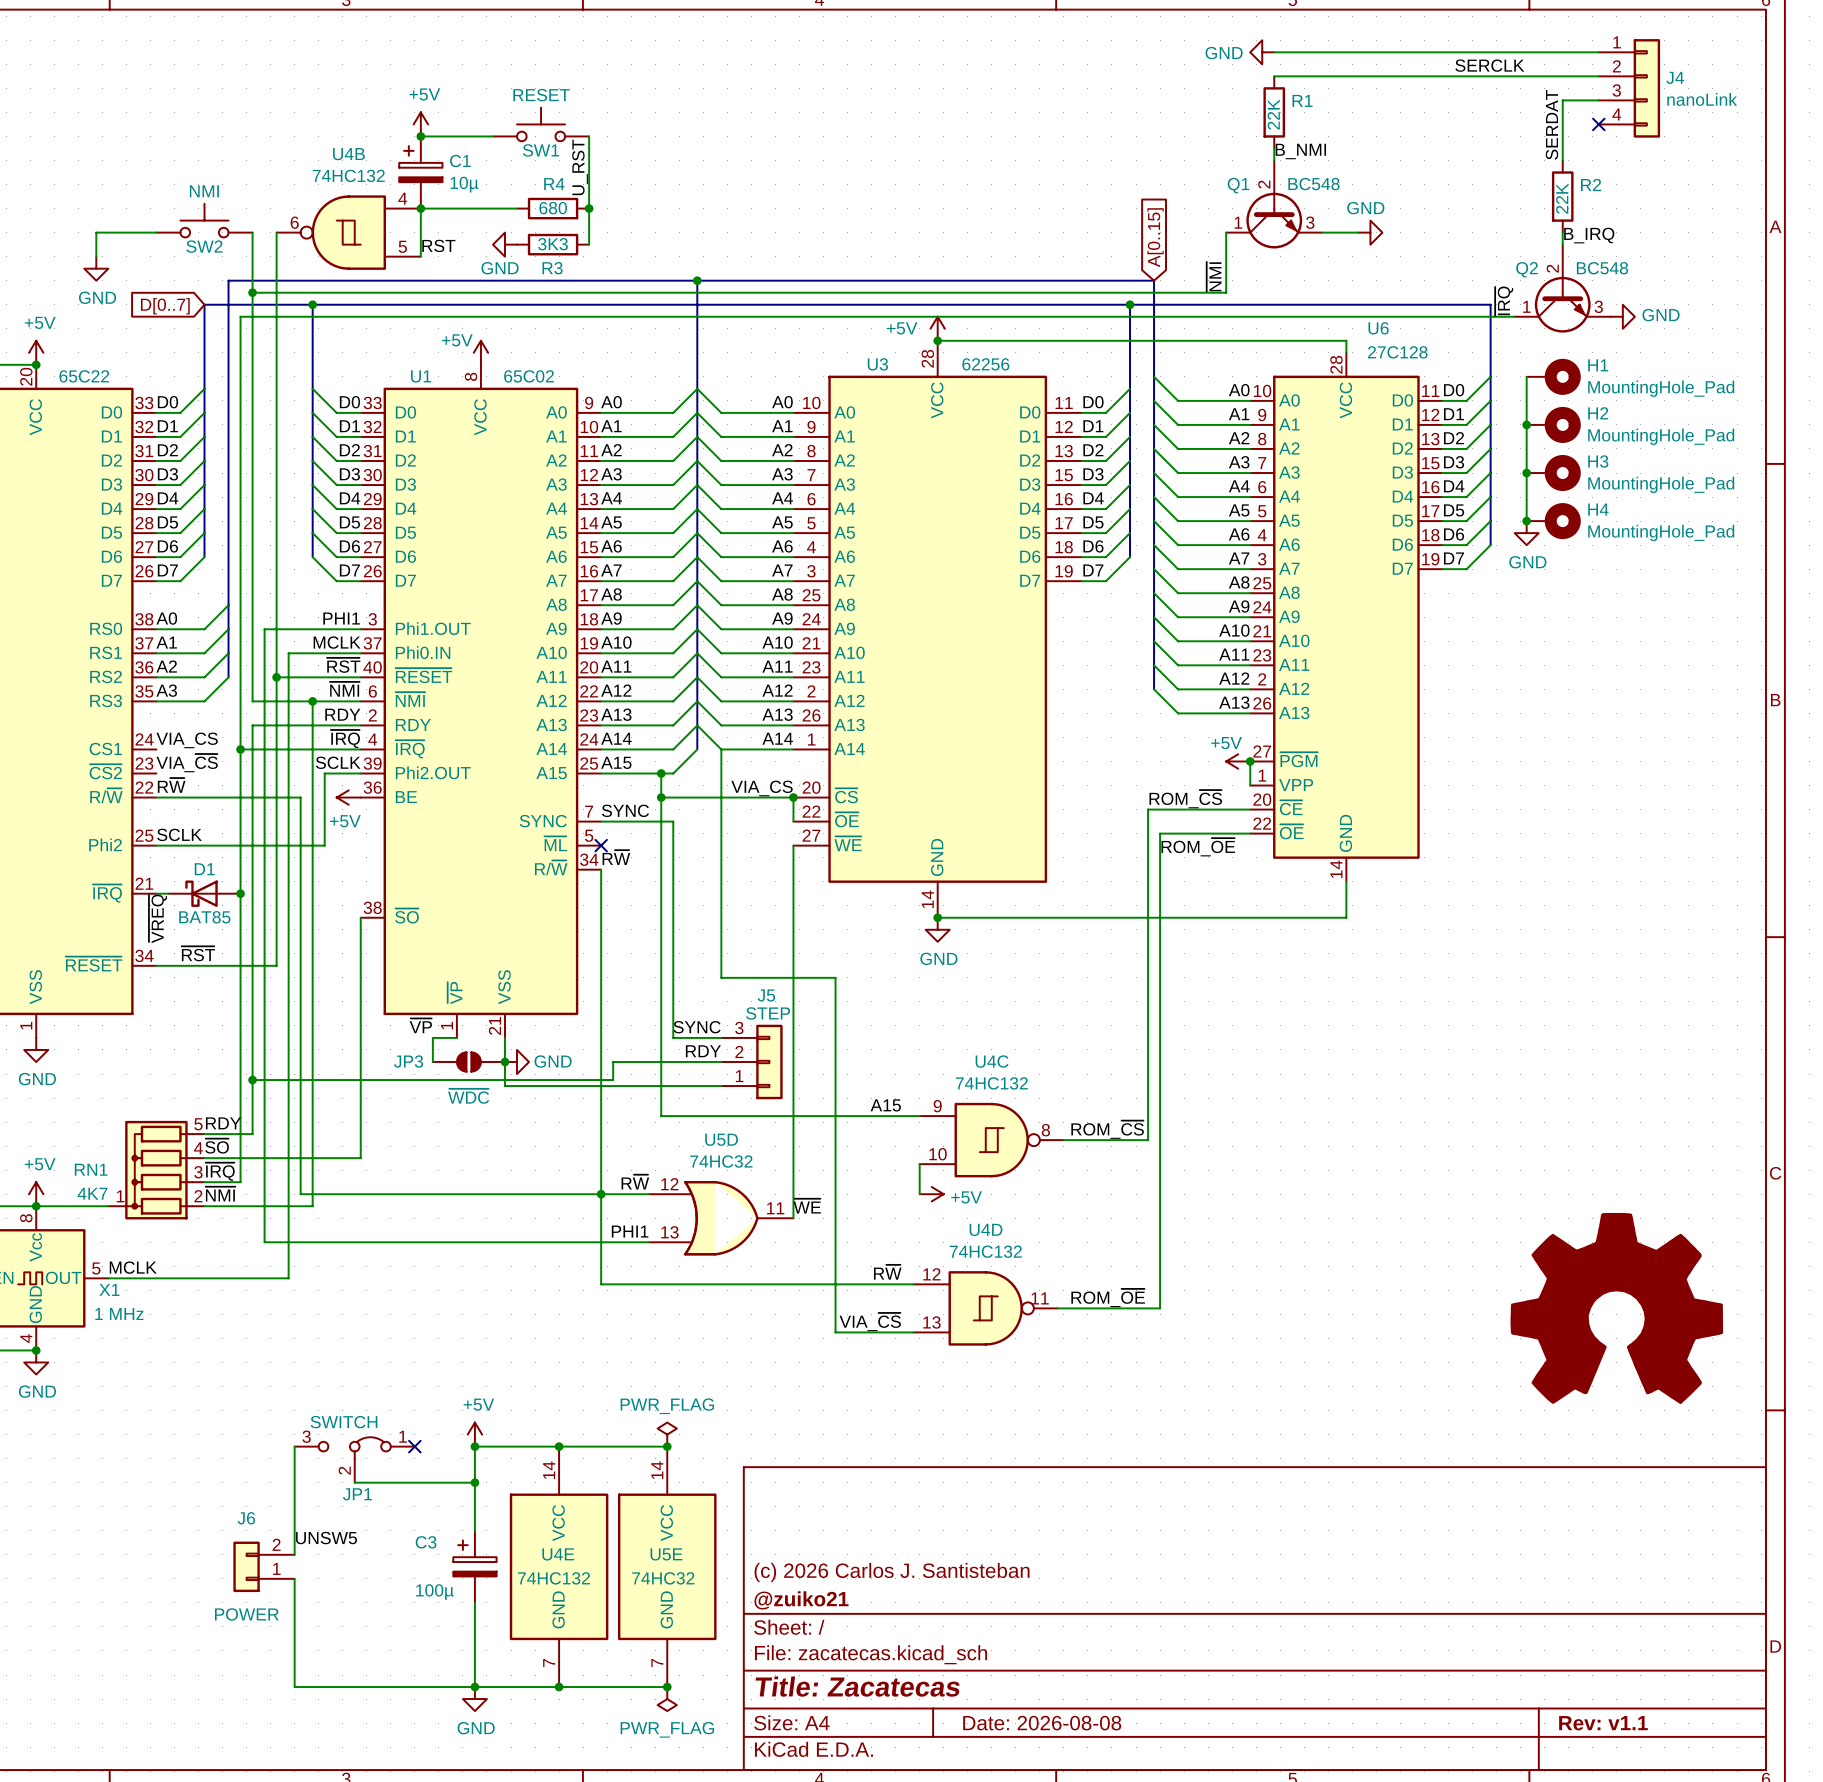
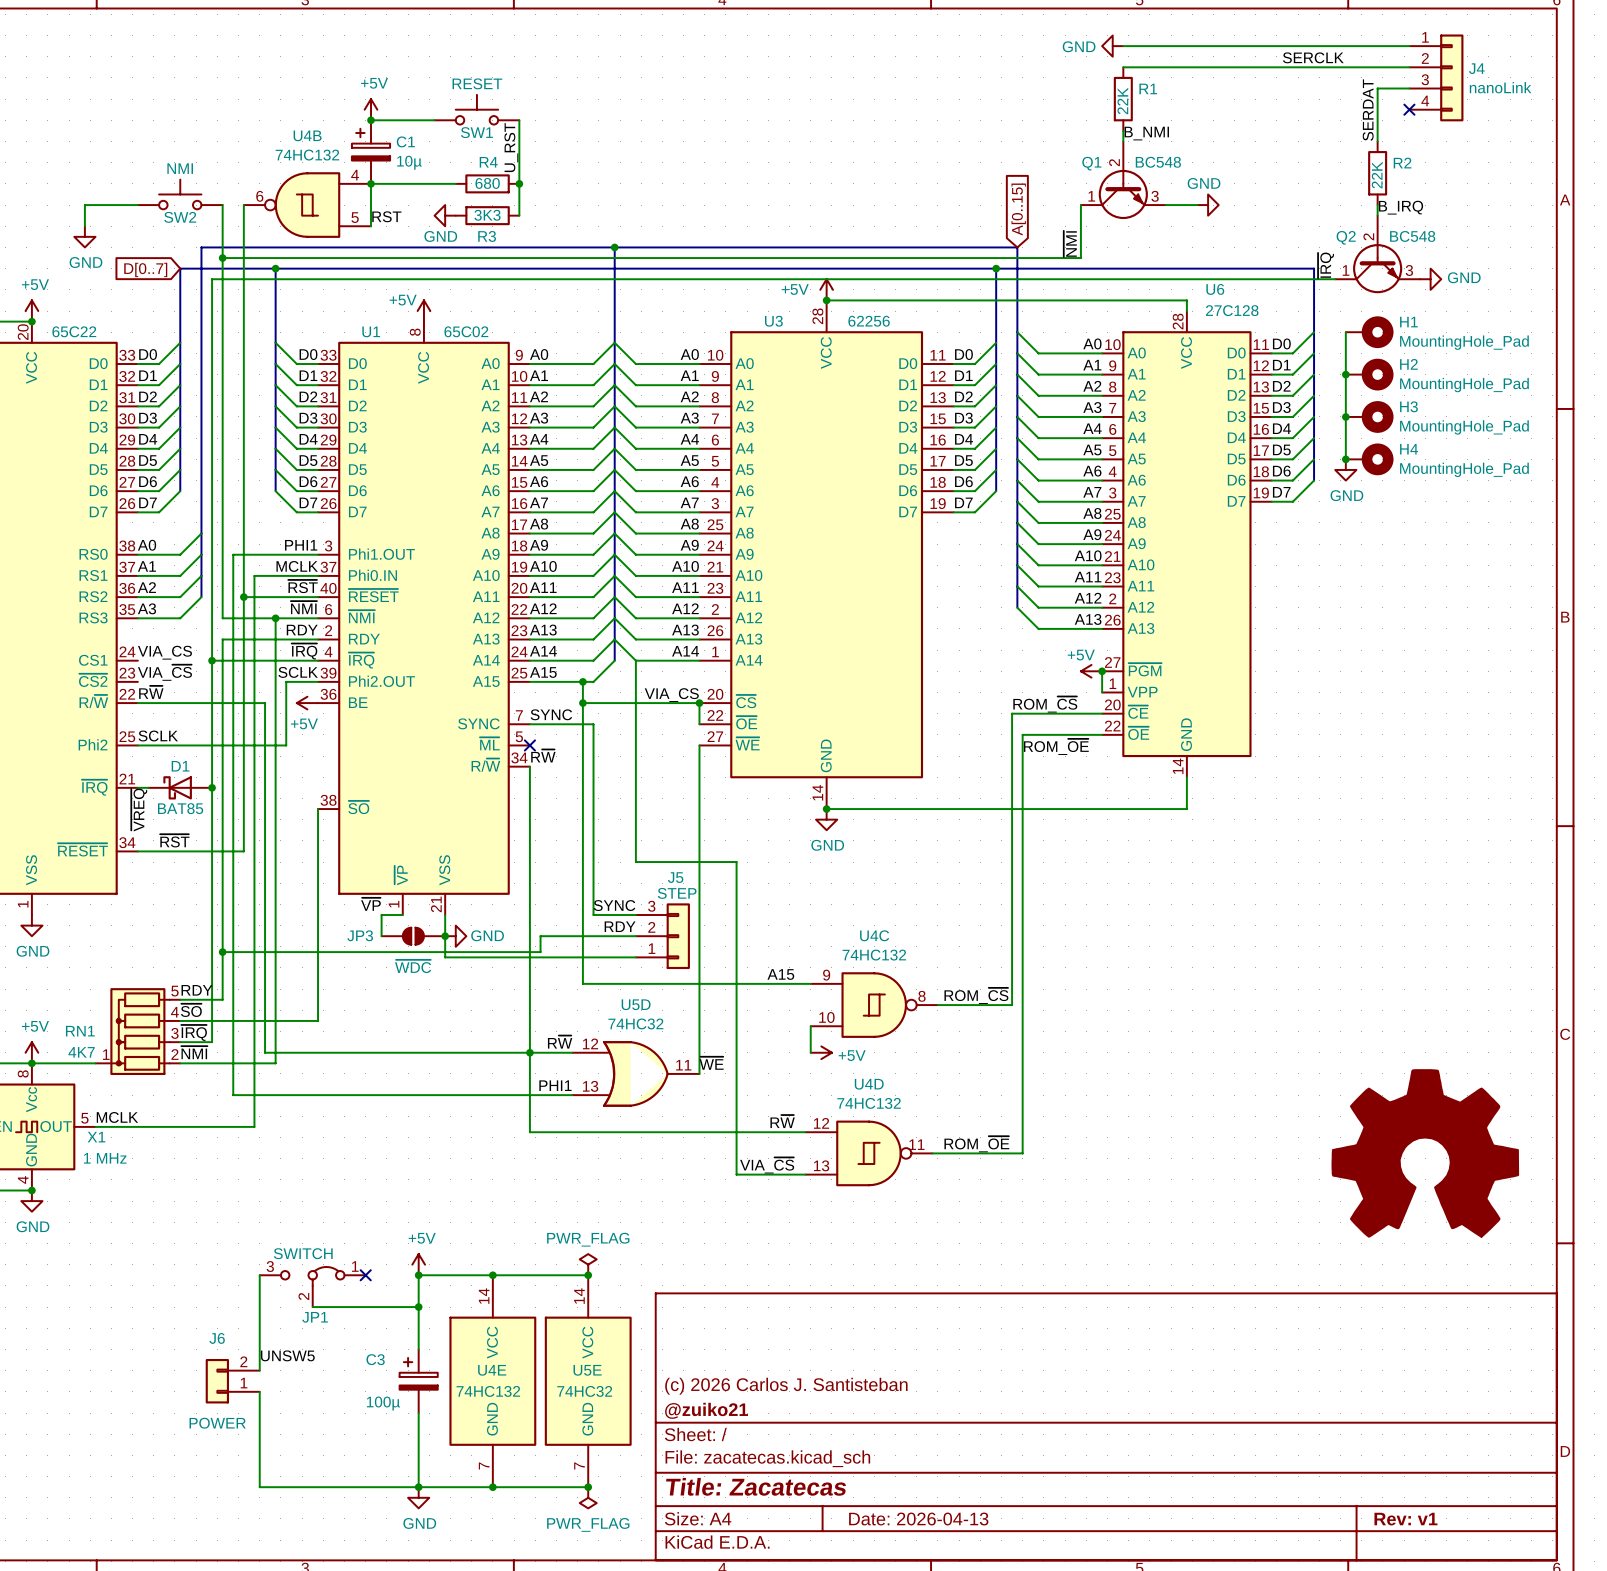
title block: Date: 2026-08-08 (1042, 1723) -> Date: 2026-04-13 (918, 1519)
title block: Rev: v1.1 (1603, 1723) -> Rev: v1 (1405, 1519)

